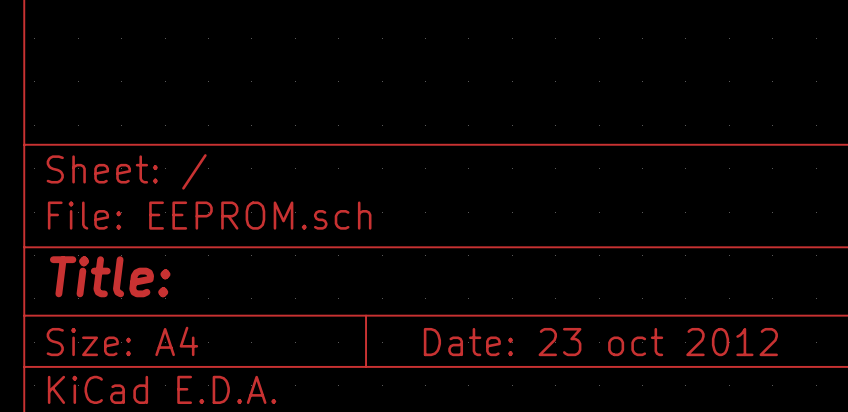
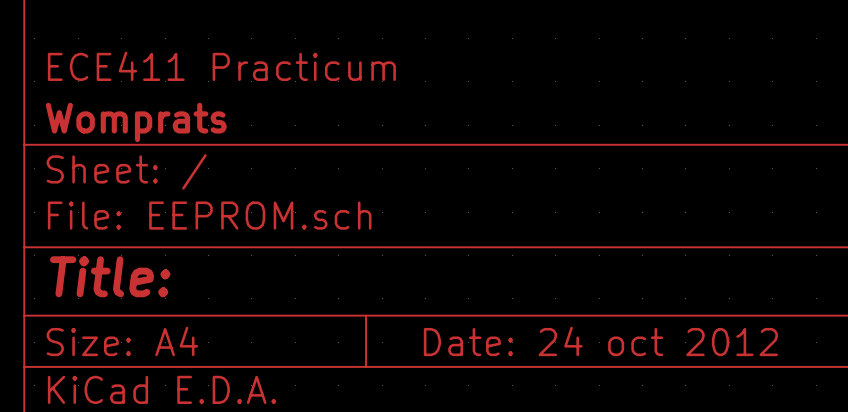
title block: none -> ECE411 Practicum (221, 66)
title block: none -> Womprats (136, 122)
title block: Date: 23 oct 2012 (600, 342) -> Date: 24 oct 2012 (600, 341)

